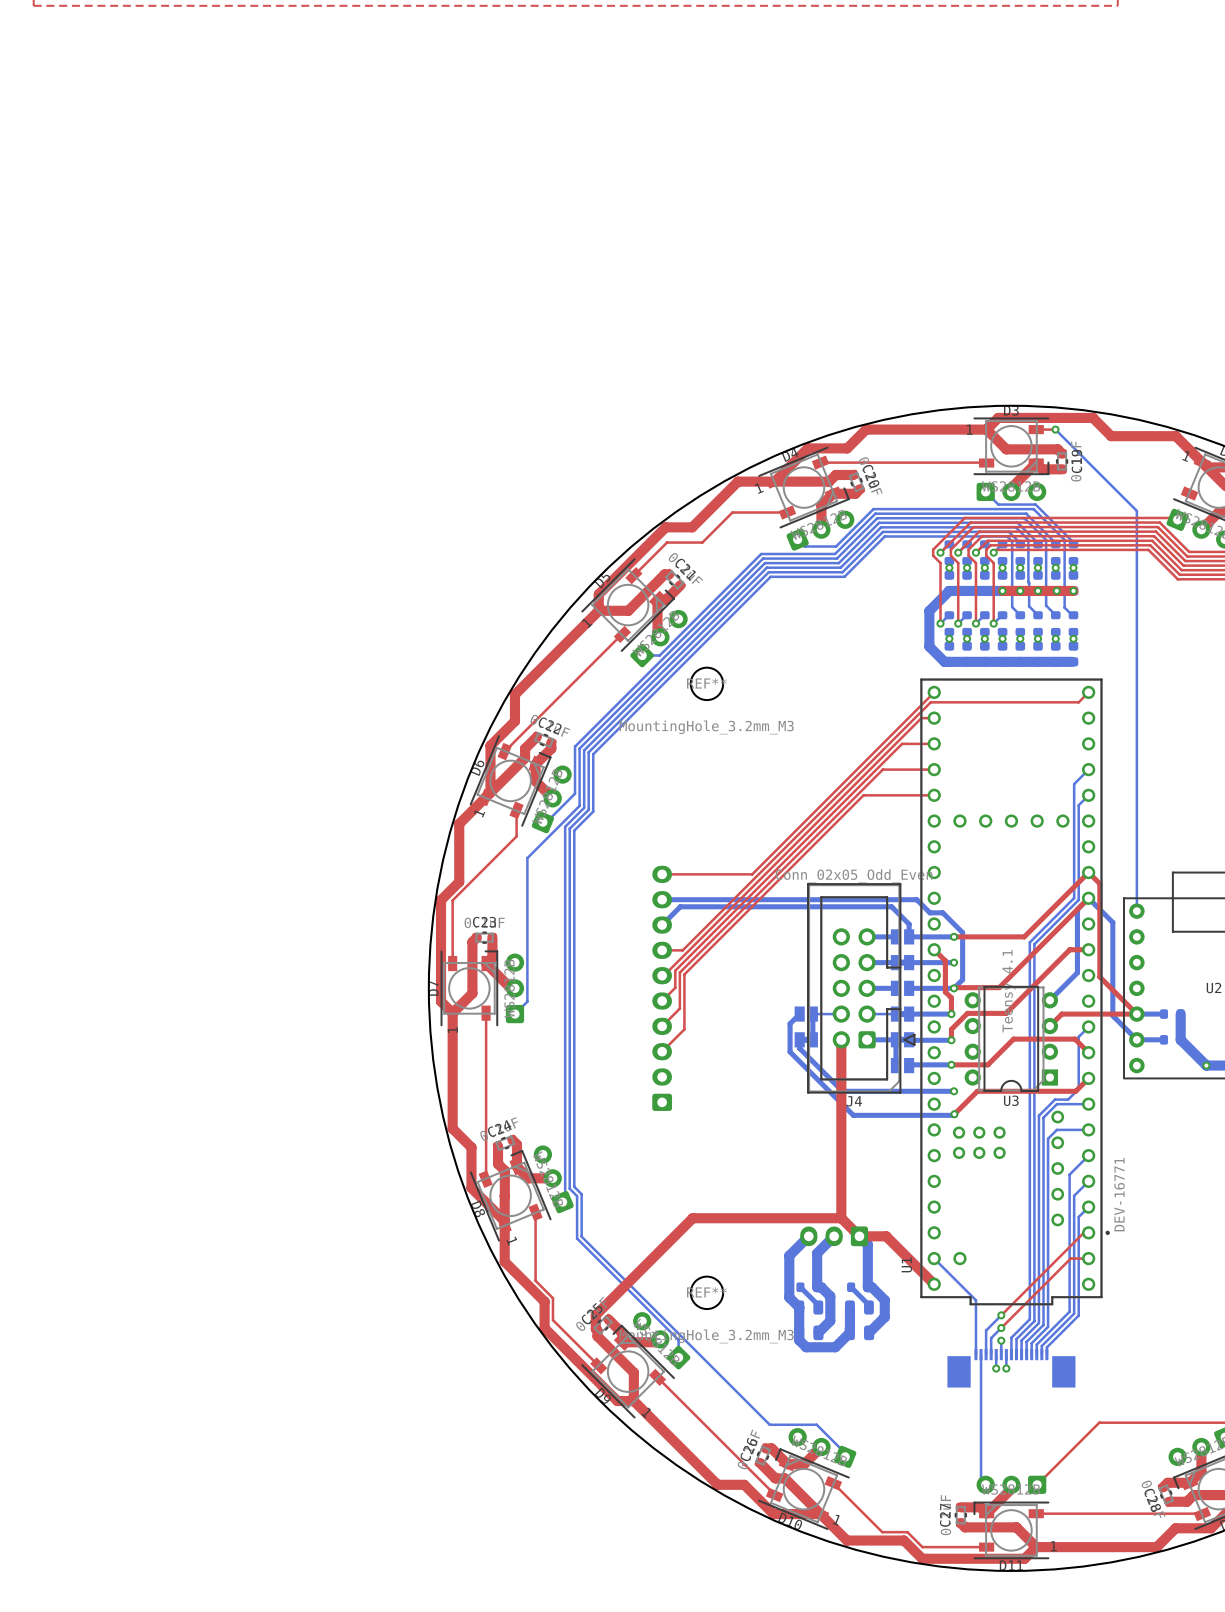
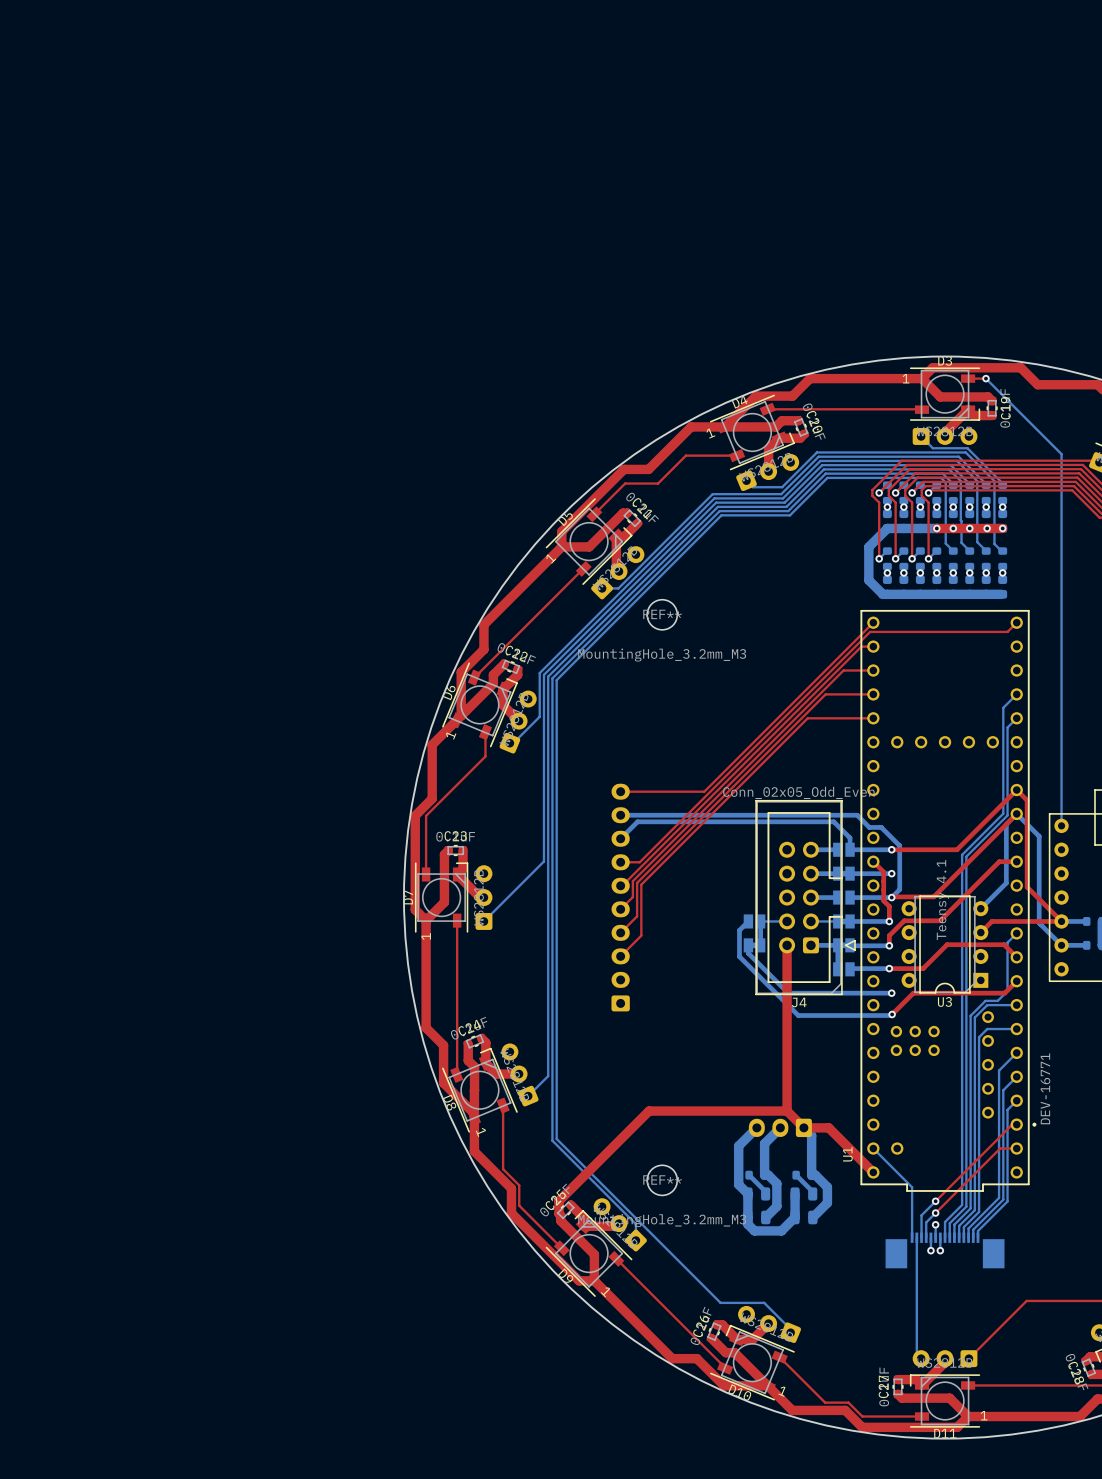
bottom track: (579, 805) (527, 858) (527, 1001) -> (543, 728) (543, 861) (495, 909)
bottom track: (584, 807) (565, 826) (565, 1199) -> (548, 729) (548, 1076) (530, 1093)
bottom track: (588, 809) (569, 828) (569, 1188) (577, 1196) (577, 1238) (588, 1250) -> (552, 731) (552, 1140)
bottom track: (593, 811) (574, 830) (574, 1186) (581, 1194) (581, 1236) (593, 1248) -> (556, 733) (556, 1138)

